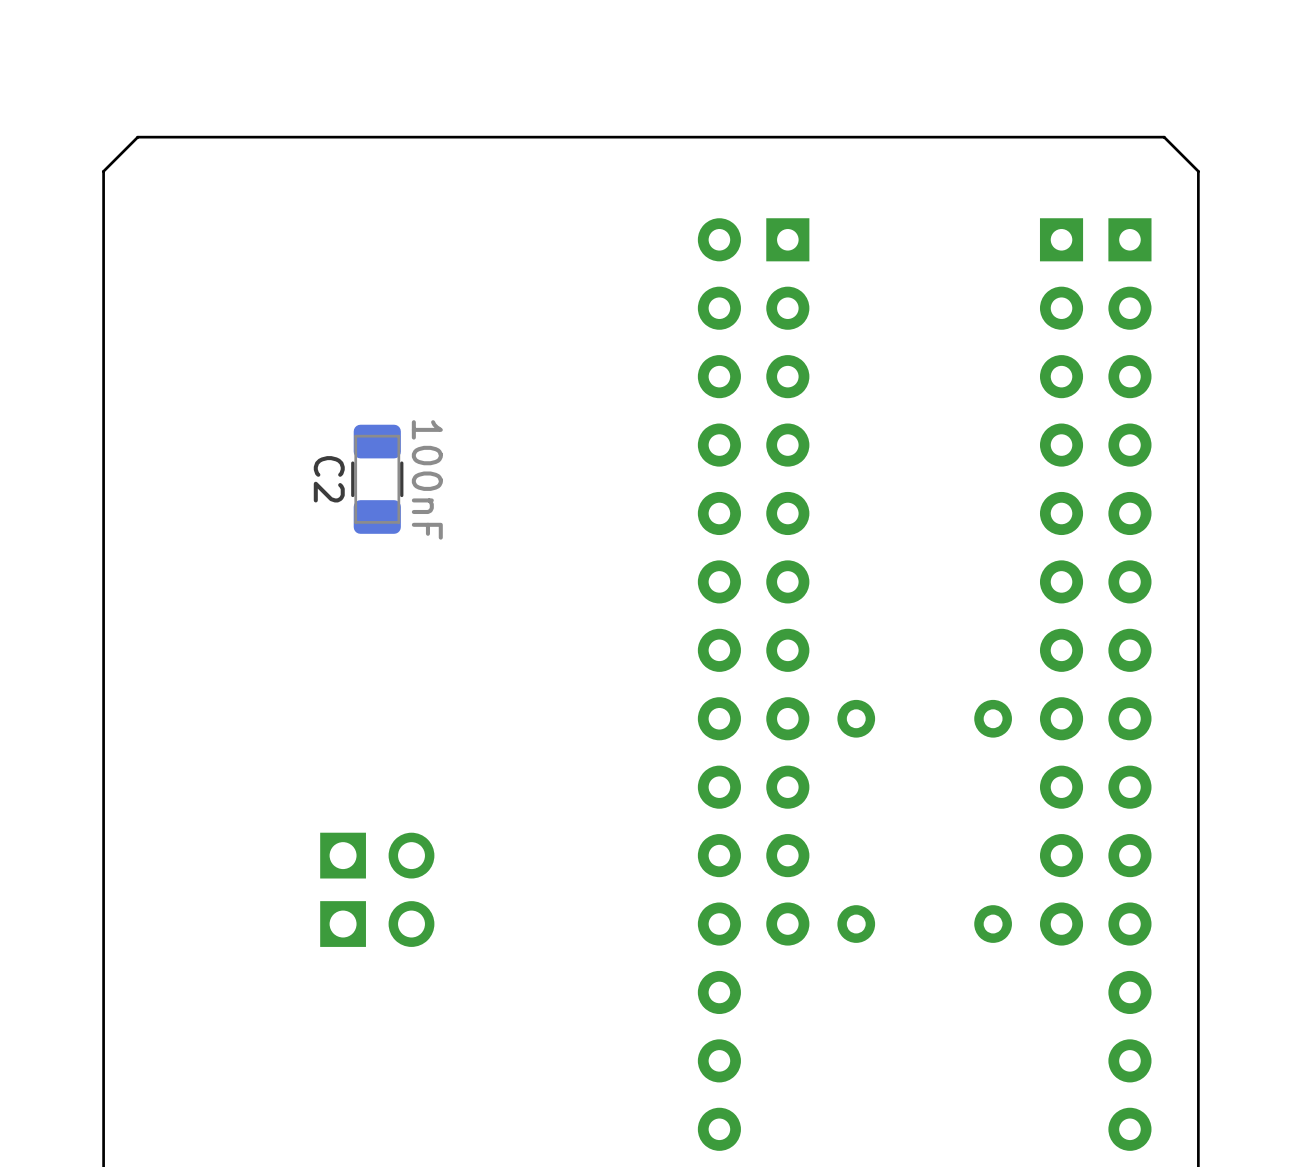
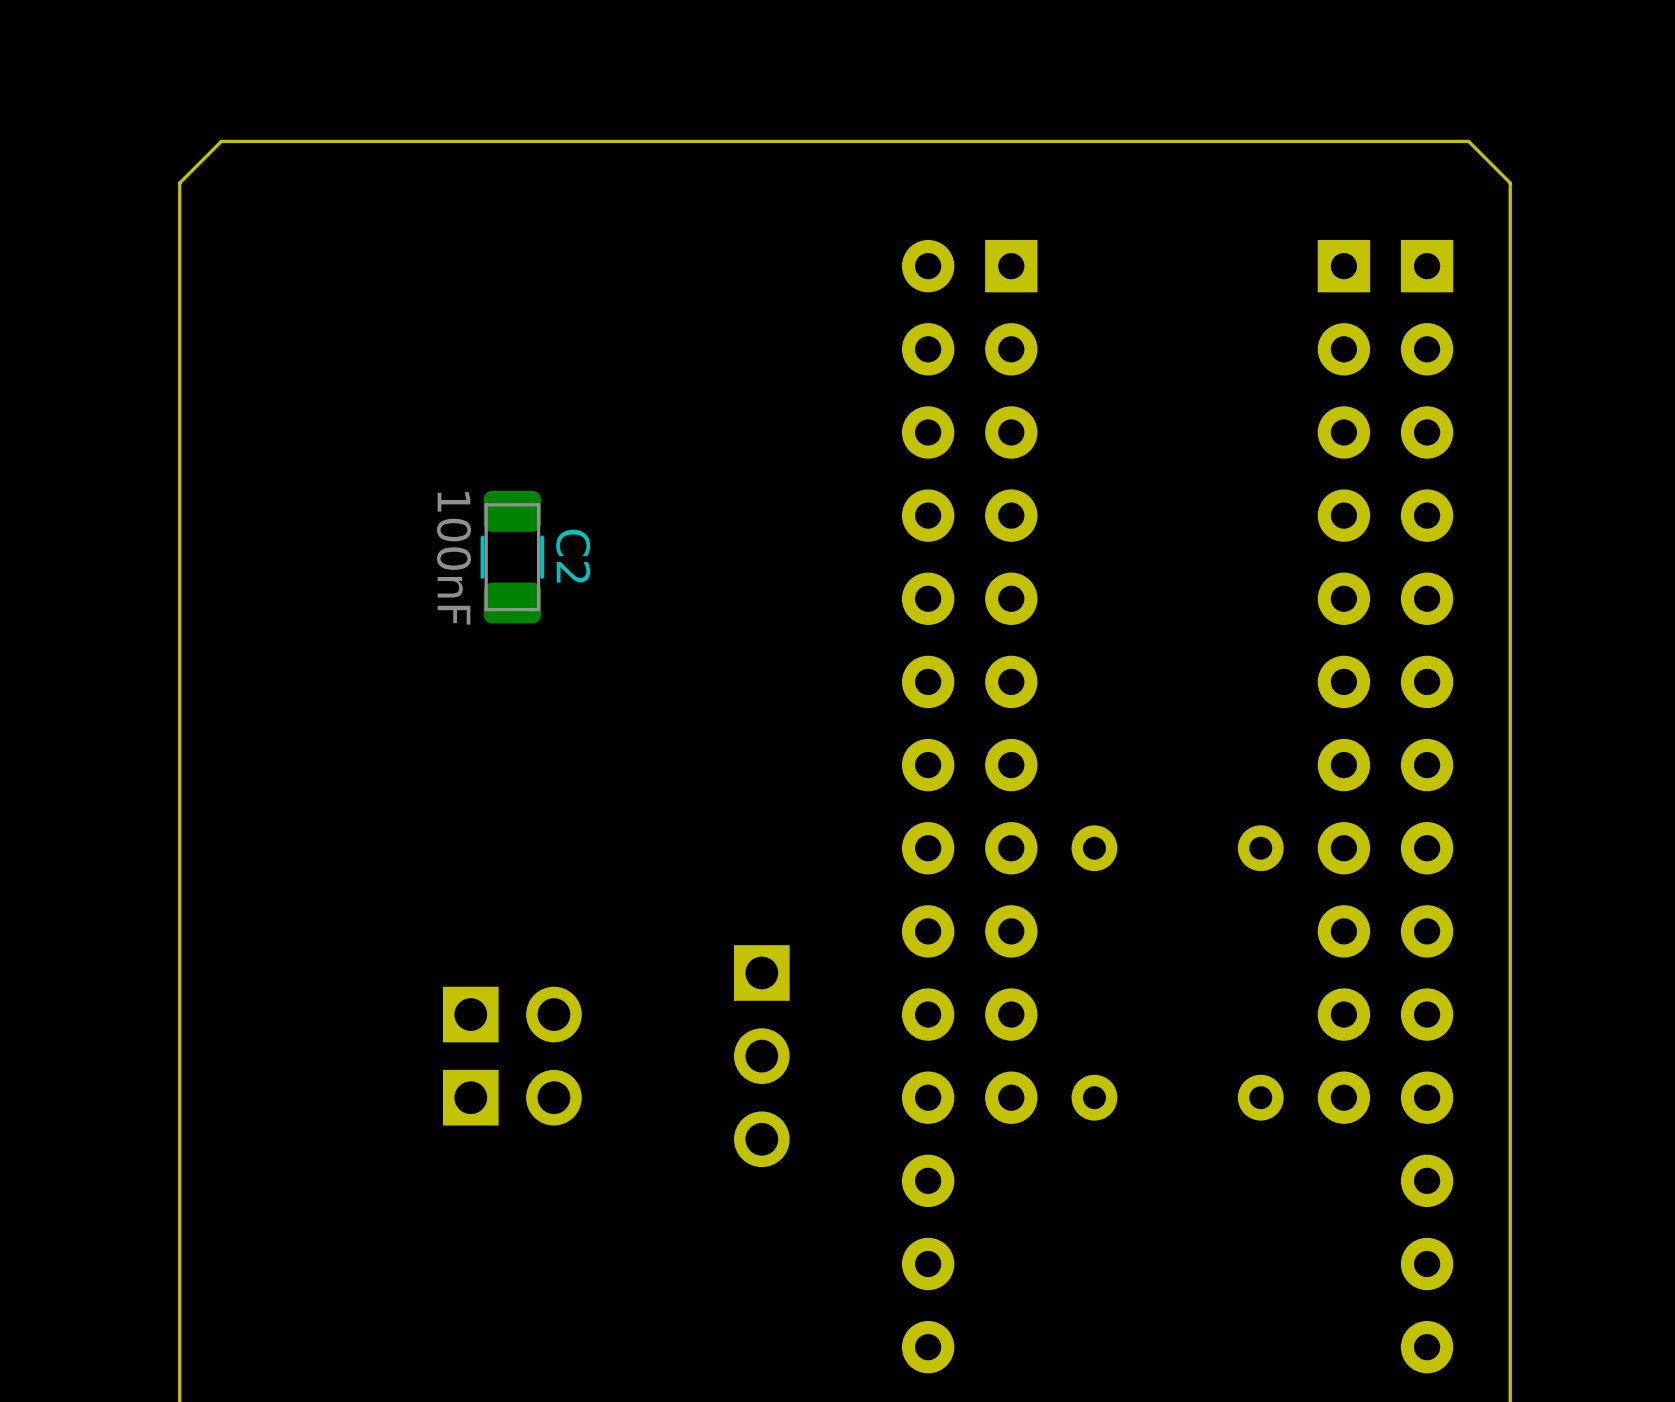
C2 name position: C2 (329, 479) -> C2 (573, 556)
C2 value position: 100nF (427, 479) -> 100nF (453, 558)
part: none -> (761, 1056)

